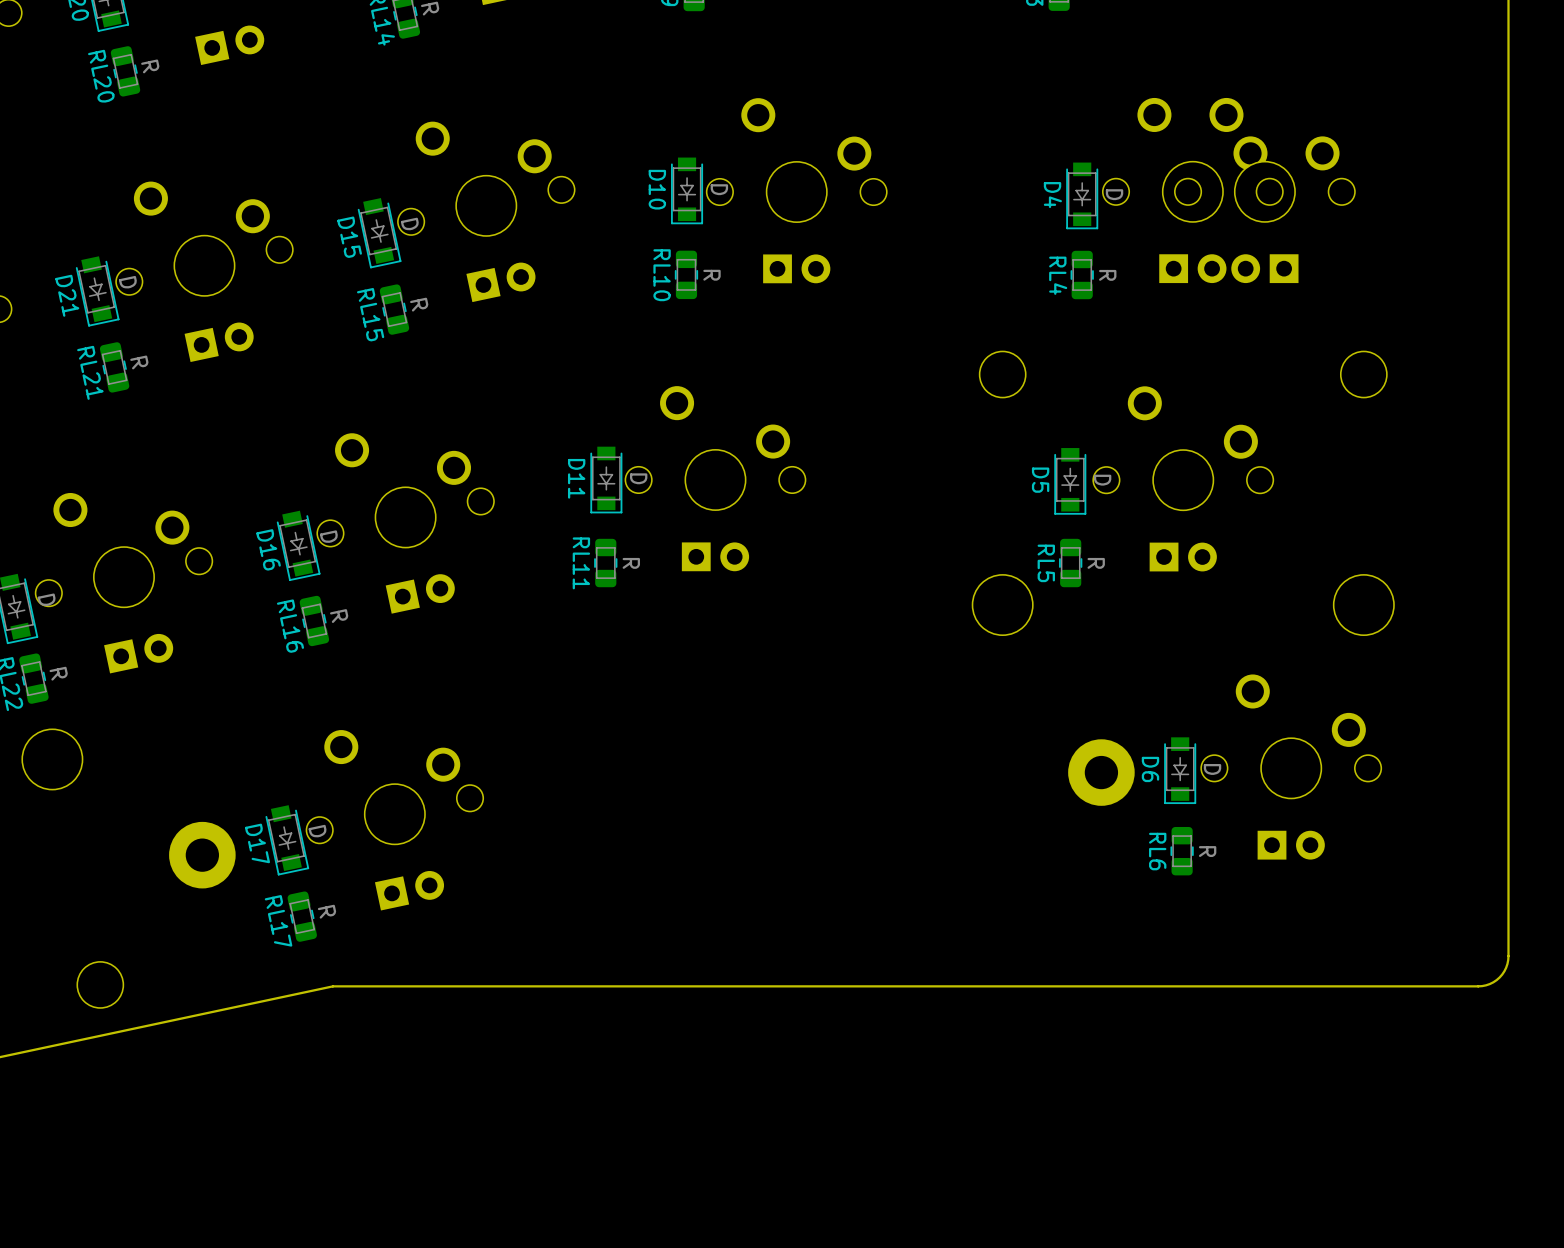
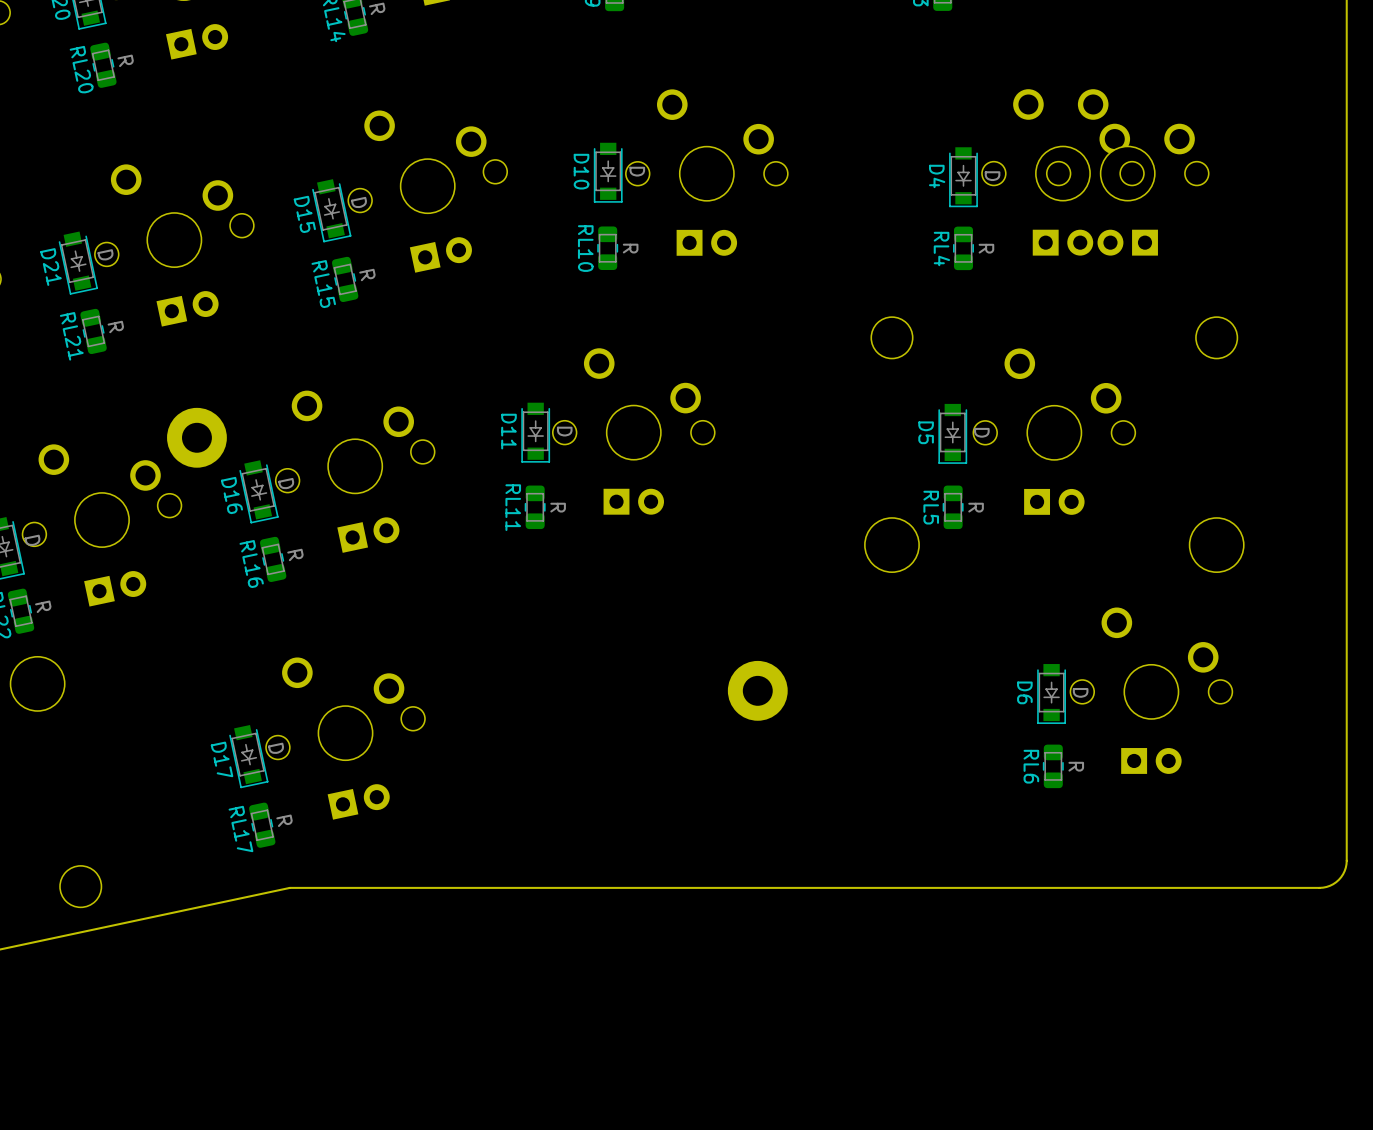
part: none -> (196, 437)
part position: (1101, 772) -> (757, 690)
part: (202, 855) -> none

